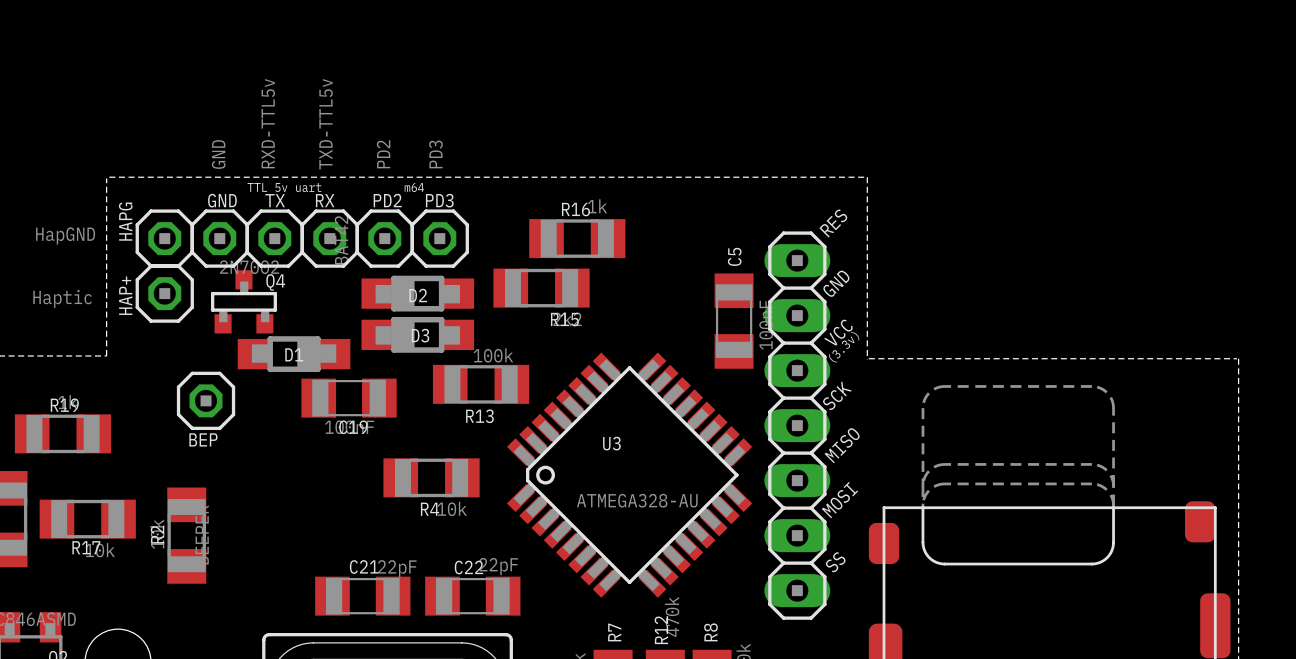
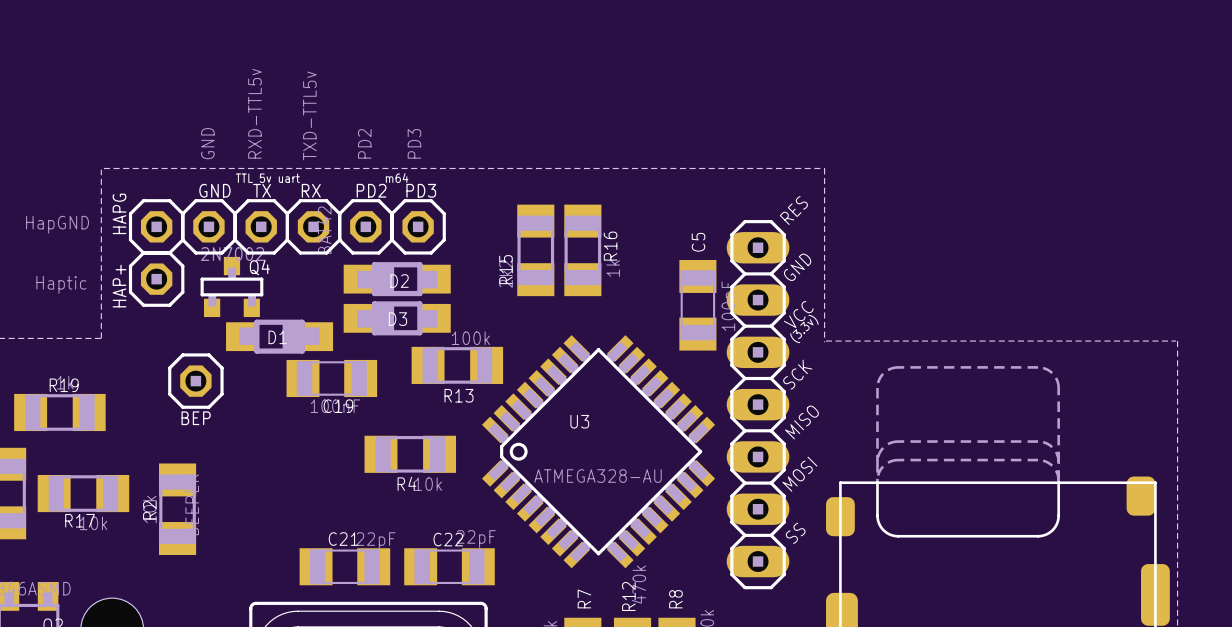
R16 rotation: 0° (577, 238) -> 90° clockwise (582, 250)
R15 rotation: 0° (541, 288) -> 90° clockwise (535, 250)

